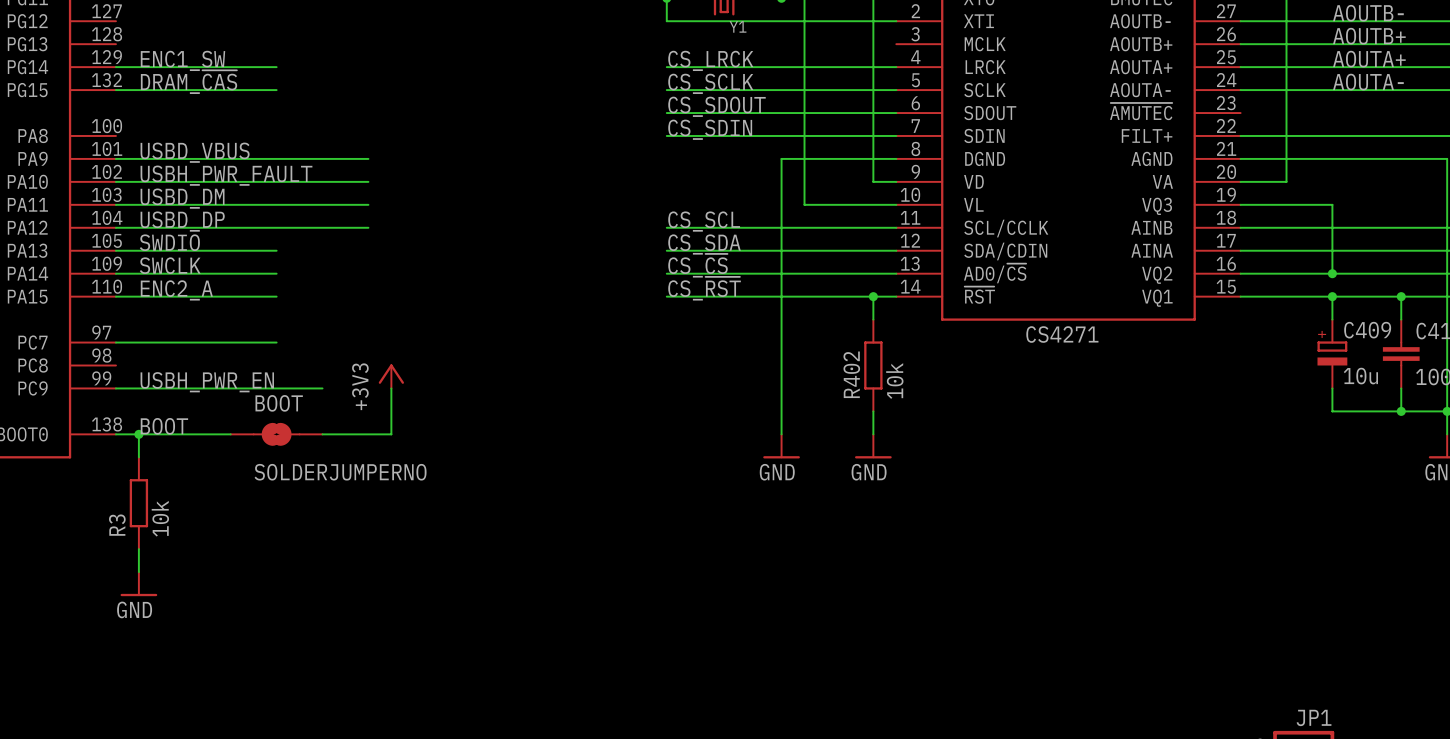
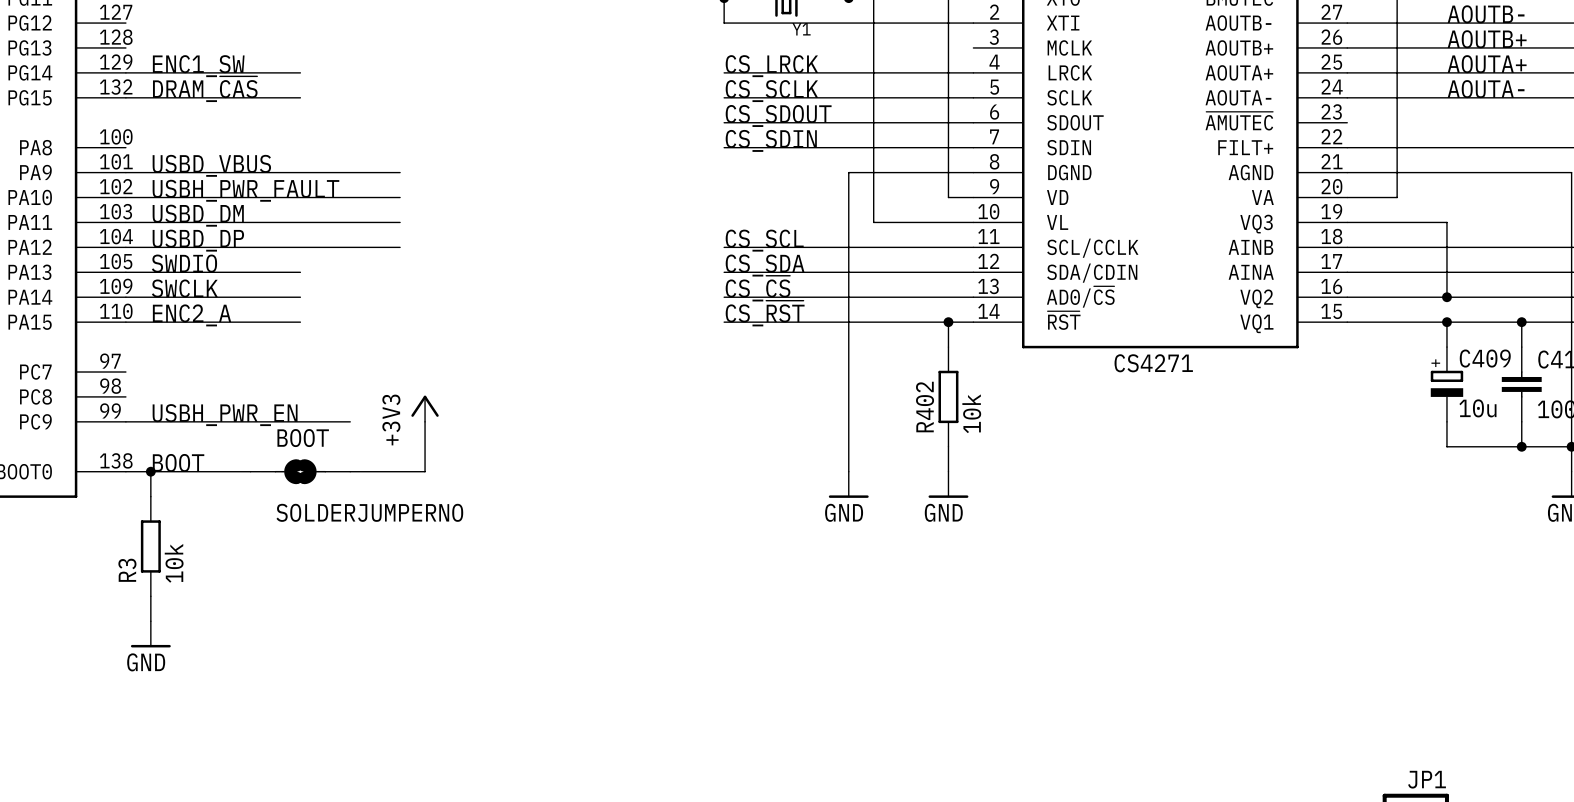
wire: (115, 342) (276, 342) -> none

